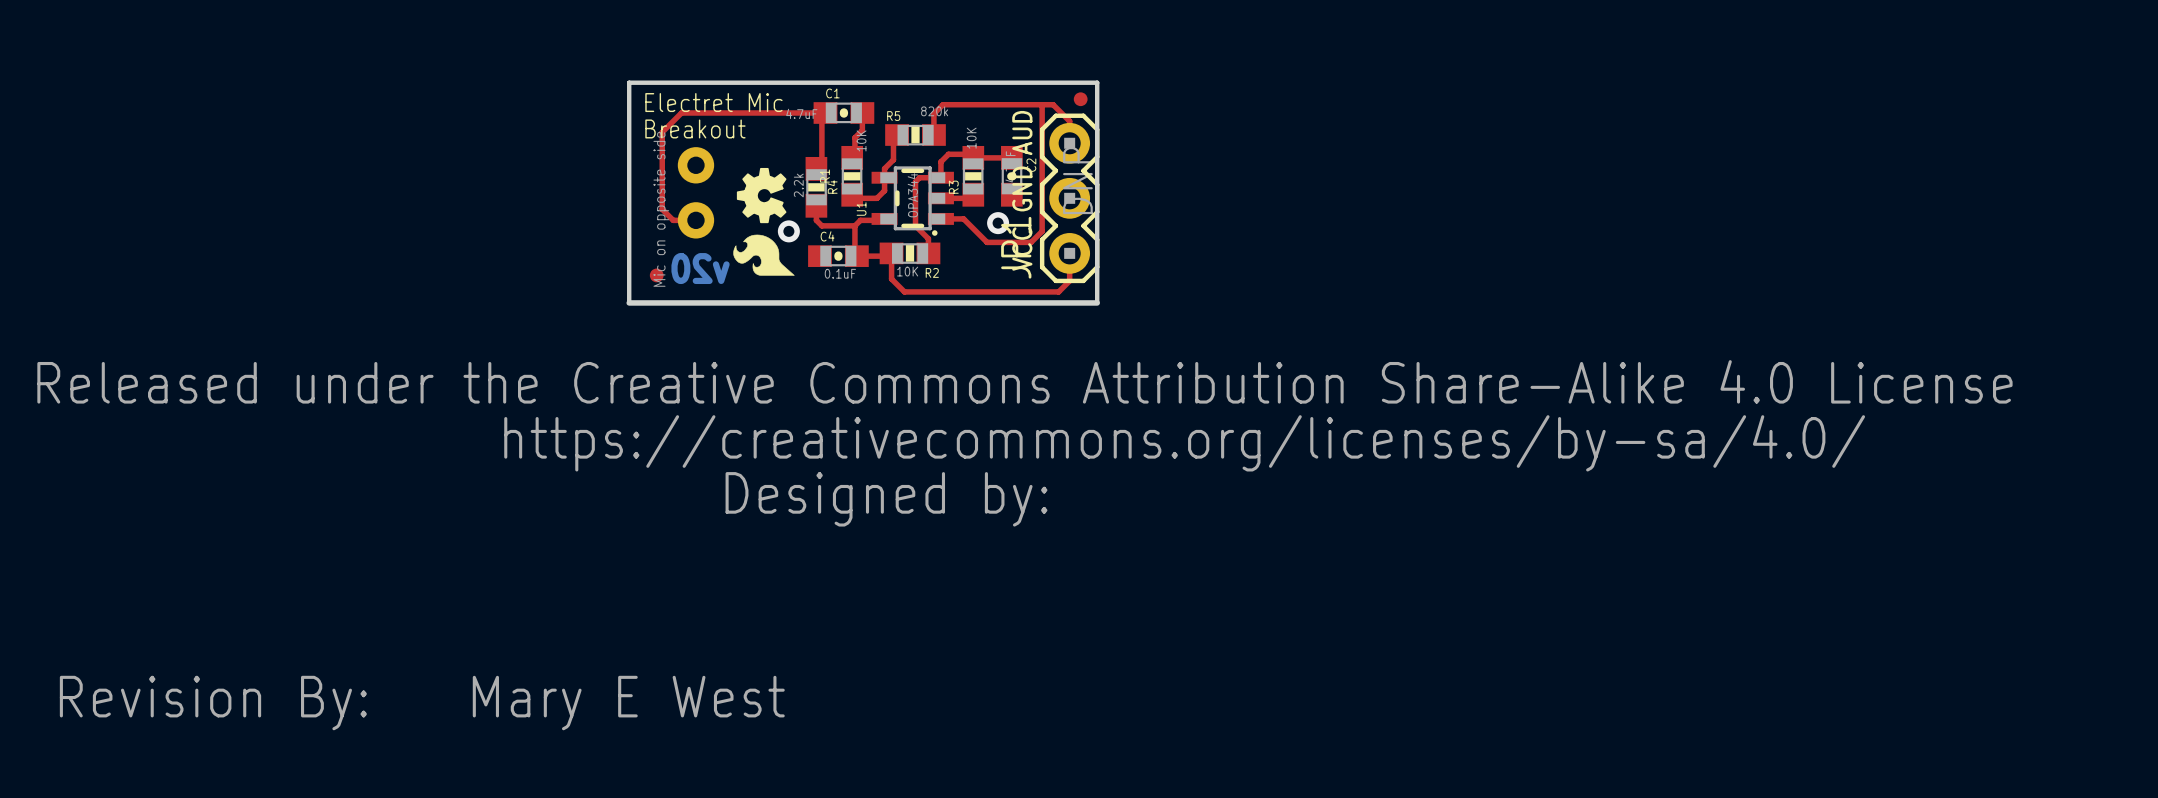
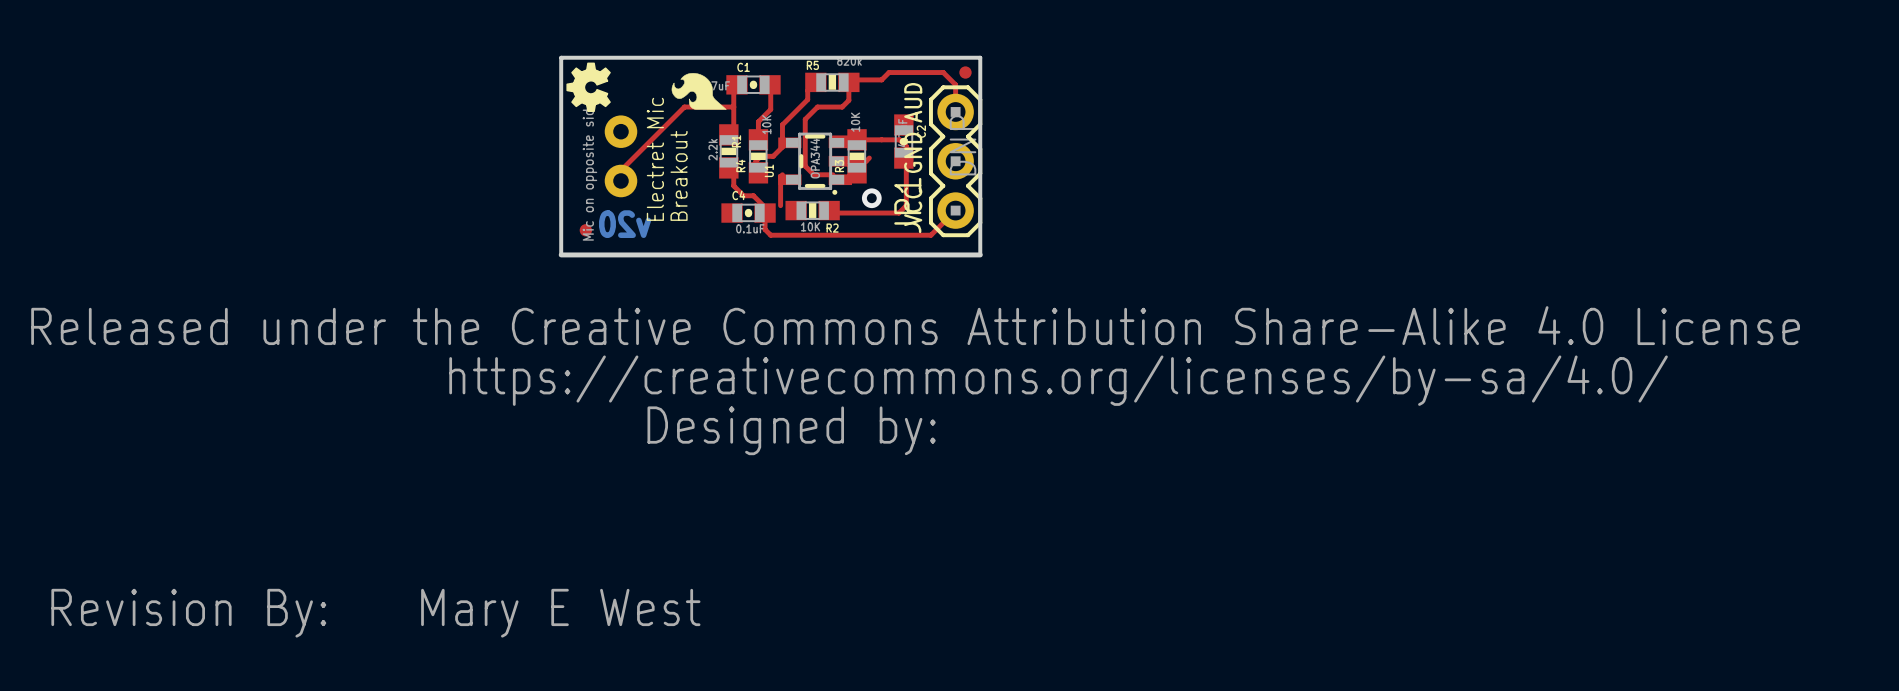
text rotation: 0° (713, 102) -> 90° counterclockwise (655, 159)
top track: (1042, 104) (1042, 231) (1031, 242) (987, 242) (963, 218) (940, 218) -> none
top track: none -> (774, 82) (770, 86) (770, 109) (758, 121) (758, 139)
top track: none -> (815, 82) (807, 90) (807, 99) (782, 124) (782, 147) (773, 156) (760, 156) (755, 161) (755, 170) (758, 172)
top track: (862, 113) (862, 130) (854, 137) (854, 155) (852, 157) -> none
top track: (821, 116) (825, 113) (681, 113) (662, 132) (662, 209) (673, 220) (695, 220) -> (733, 107) (684, 107) (620, 170) (620, 180)
top track: (1069, 121) (1053, 104) (943, 104) (933, 113) (933, 135) -> (955, 92) (955, 84) (943, 72) (889, 72) (881, 79) (851, 79) (848, 82) (848, 100) (842, 107) (817, 107) (805, 119) (805, 166) (813, 174) (832, 174)
text rotation: 0° (695, 128) -> 90° counterclockwise (679, 175)
top track: (897, 135) (893, 138) (893, 159) (884, 168) (884, 190) (876, 198) (855, 198) (852, 194) -> none
R5 position: (915, 135) -> (832, 82)
top track: (1011, 157) (973, 157) (969, 154) (948, 154) (940, 161) (940, 177) (919, 177) (915, 181) (915, 225) (928, 238) (928, 251) -> (832, 137) (899, 139) (906, 146) (906, 205) (898, 213) (837, 213) (832, 205) (829, 208)
R4 position: (852, 176) -> (758, 156)
R3 position: (973, 176) -> (857, 156)
drawing position: (761, 195) -> (588, 87)
top track: (816, 205) (816, 220) (821, 225) (854, 225) -> none
top track: none -> (733, 172) (733, 185) (743, 195) (753, 195) (765, 207) (765, 229) (770, 235) (930, 235) (955, 210) (955, 205)
top track: none -> (782, 174) (780, 176) (780, 205)
top track: (884, 218) (860, 220) (854, 225) -> none
via position: (998, 223) -> (871, 198)
top track: (854, 225) (854, 254) (856, 256) (888, 256) (891, 253) (891, 279) (904, 291) (1058, 291) (1069, 280) (1069, 253) -> none
via: (788, 231) -> none
drawing position: (763, 255) -> (699, 91)

